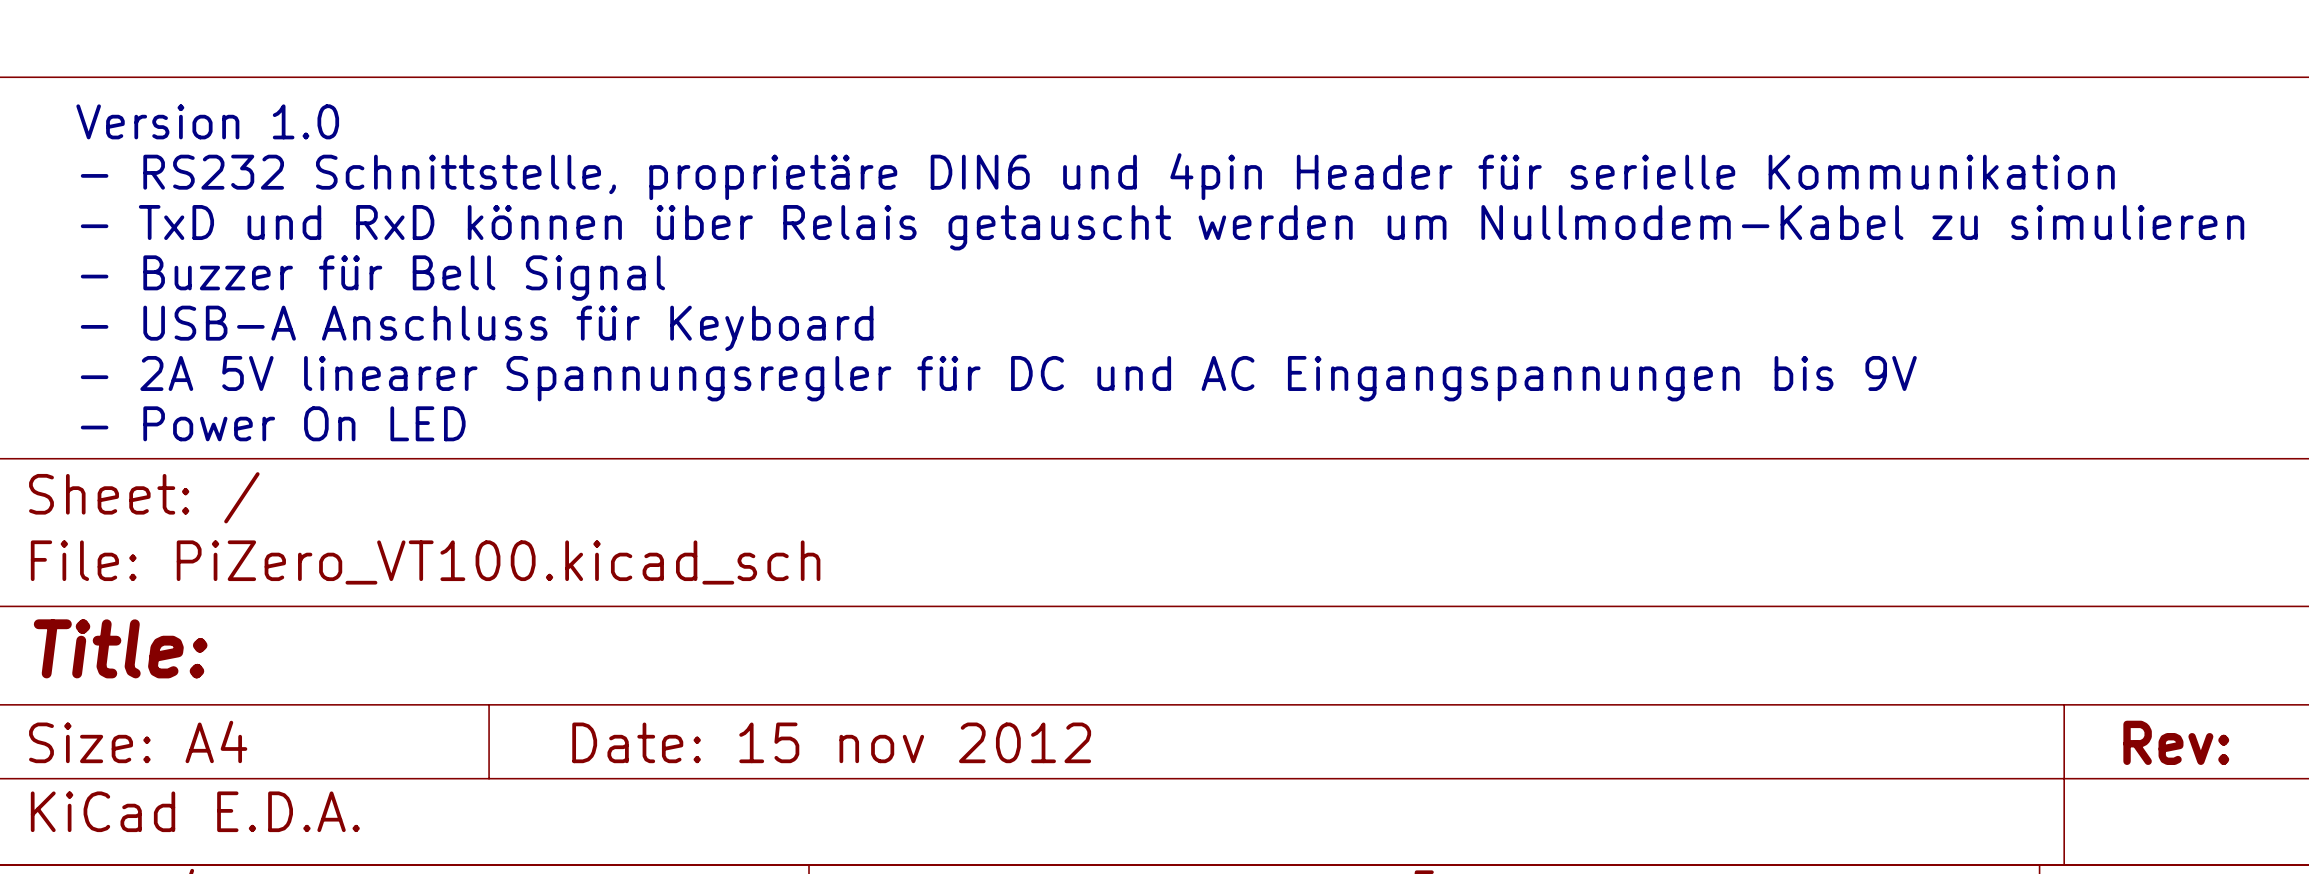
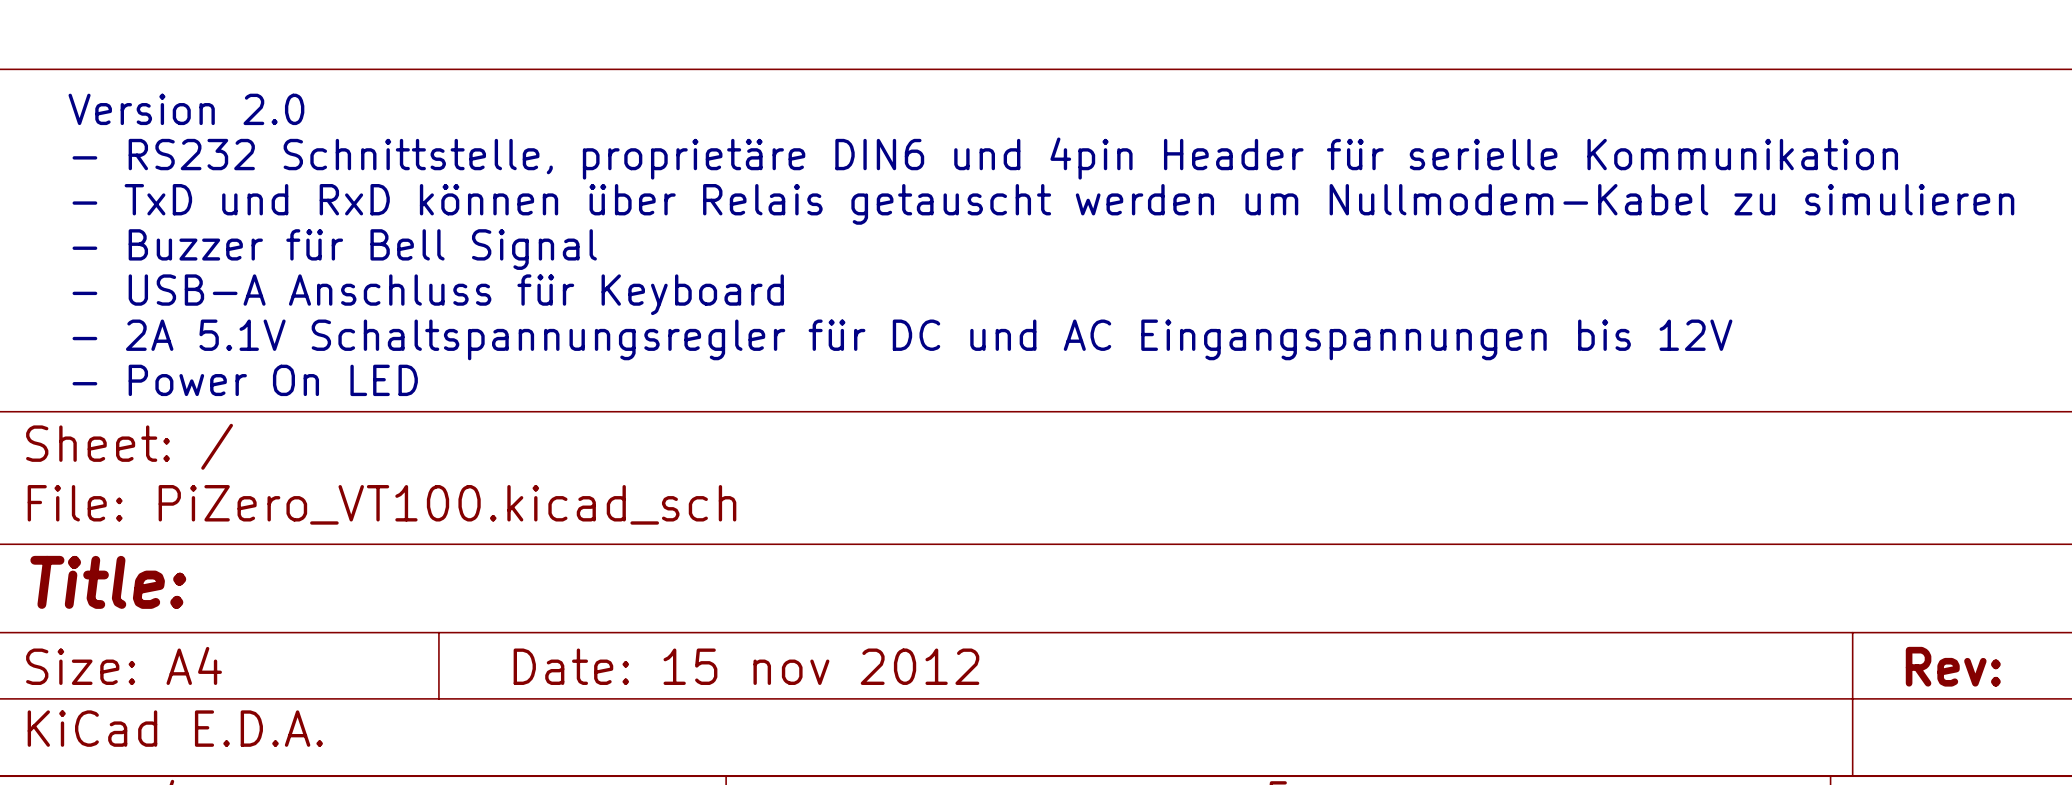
text: Version 1.0 (207, 121) -> Version 2.0 (186, 109)
text: - 2A 5V linearer Spannungsregler für DC und AC Eingangspannungen bis 9V (998, 378) -> - 2A 5.1V Schaltspannungsregler für DC und AC Eingangspannungen bis 12V (902, 339)

